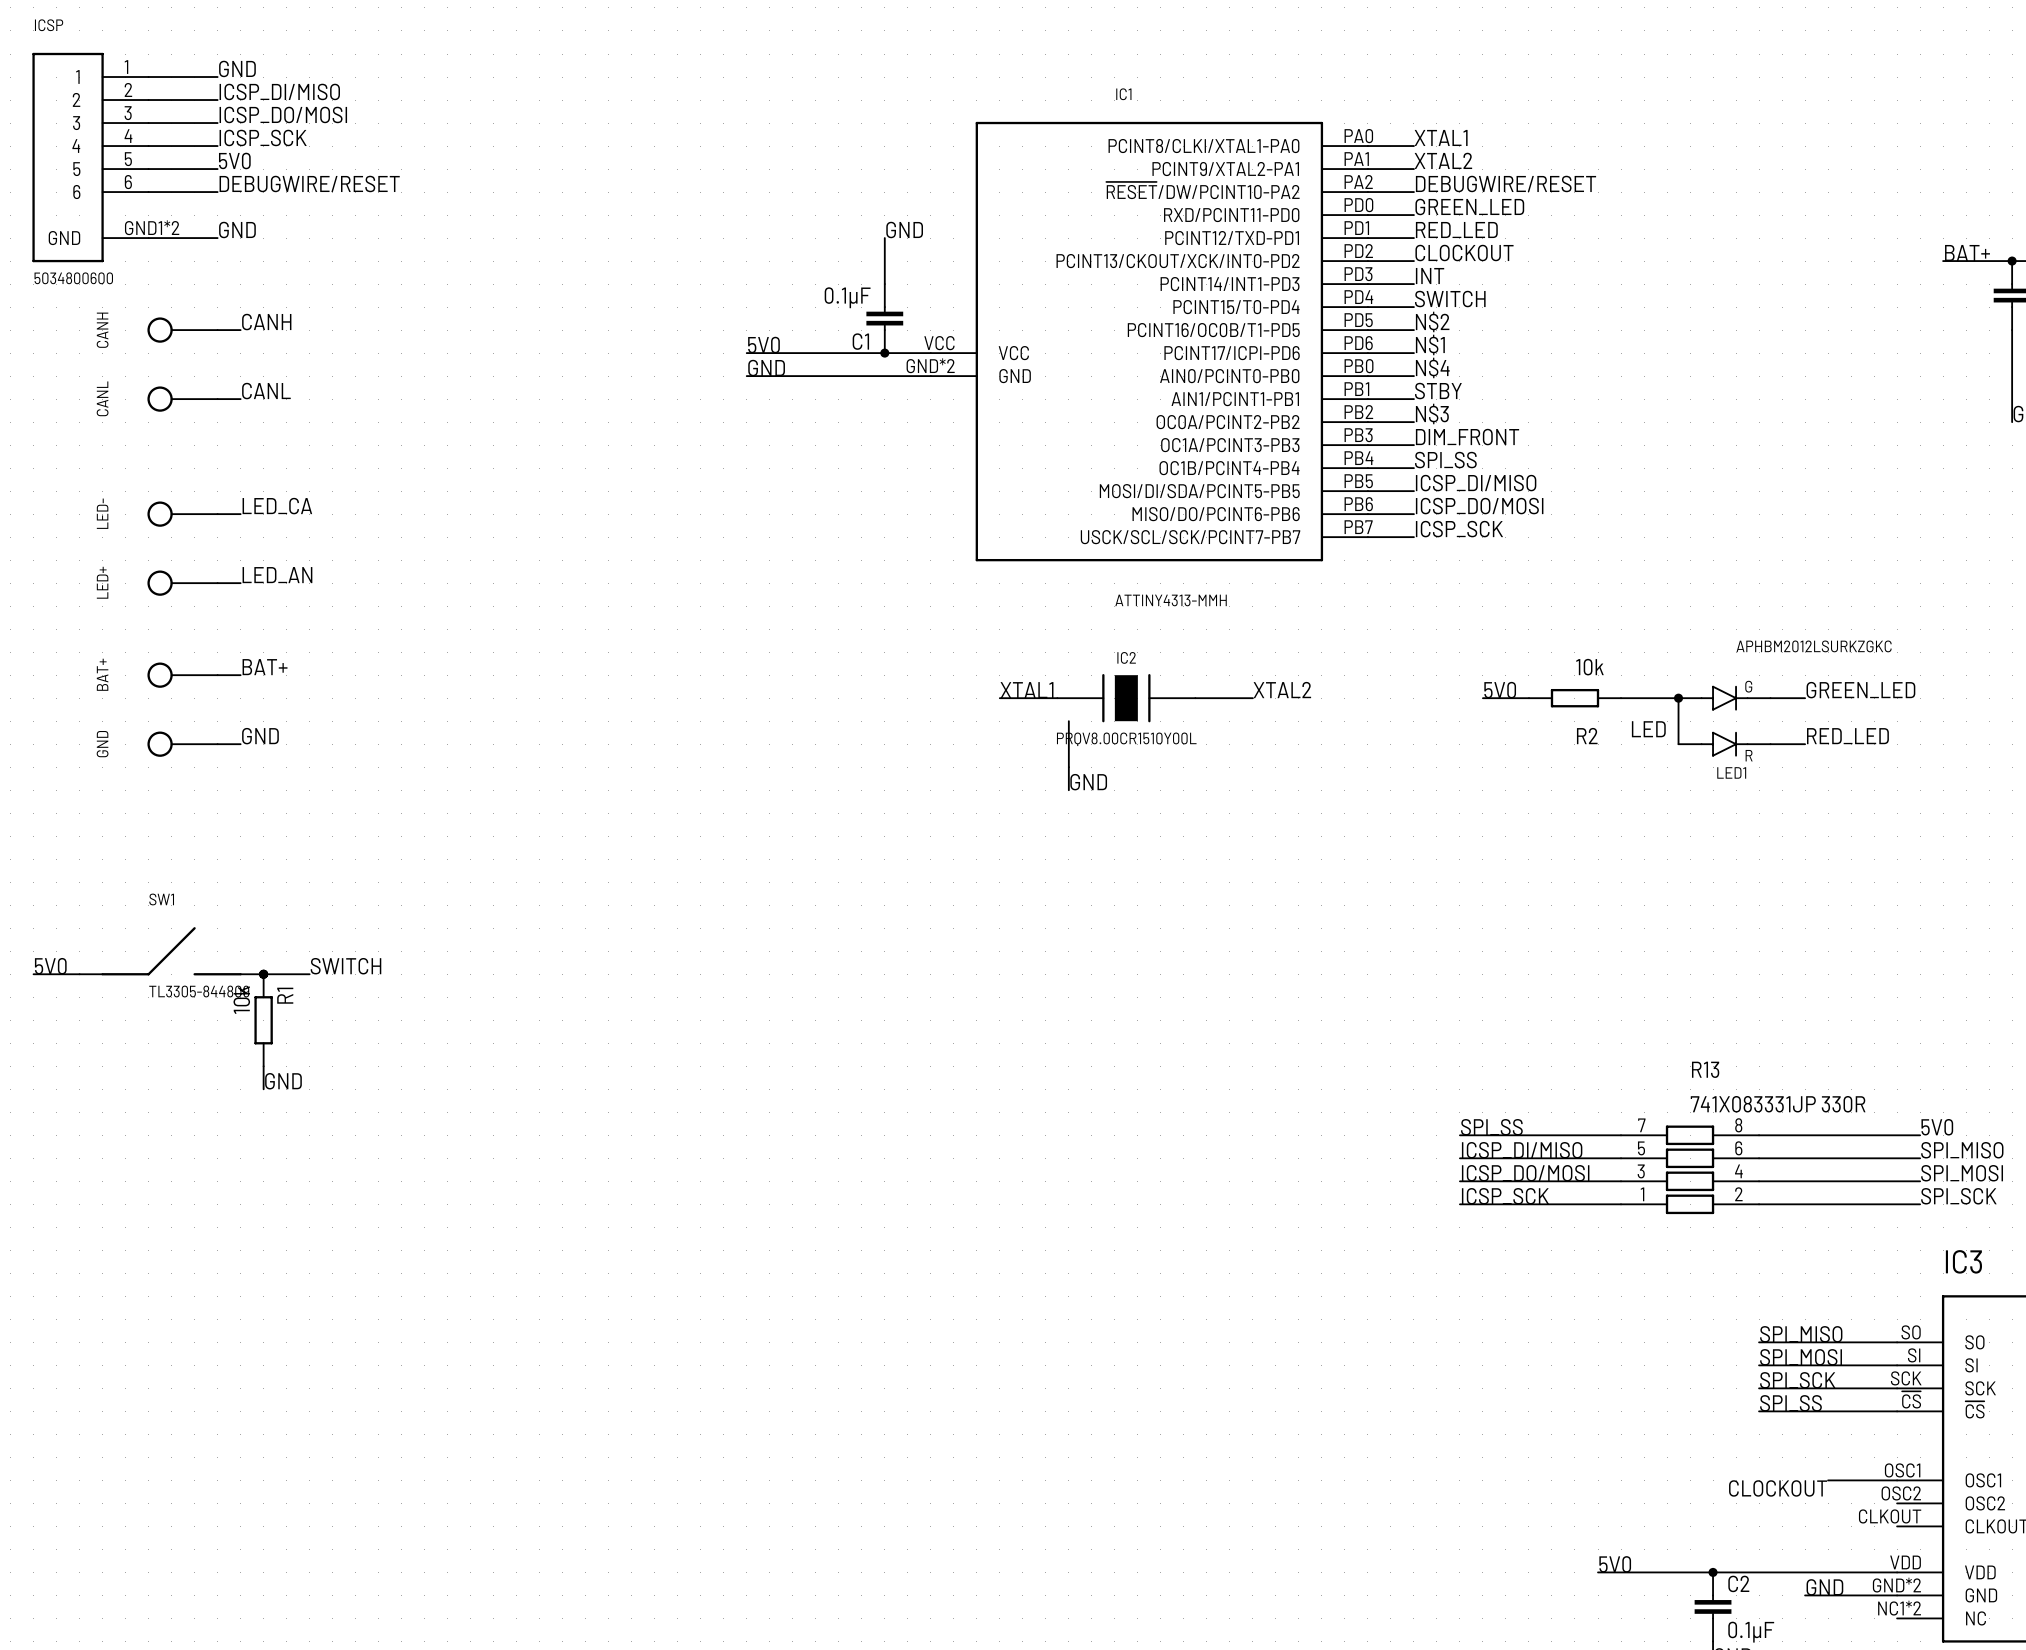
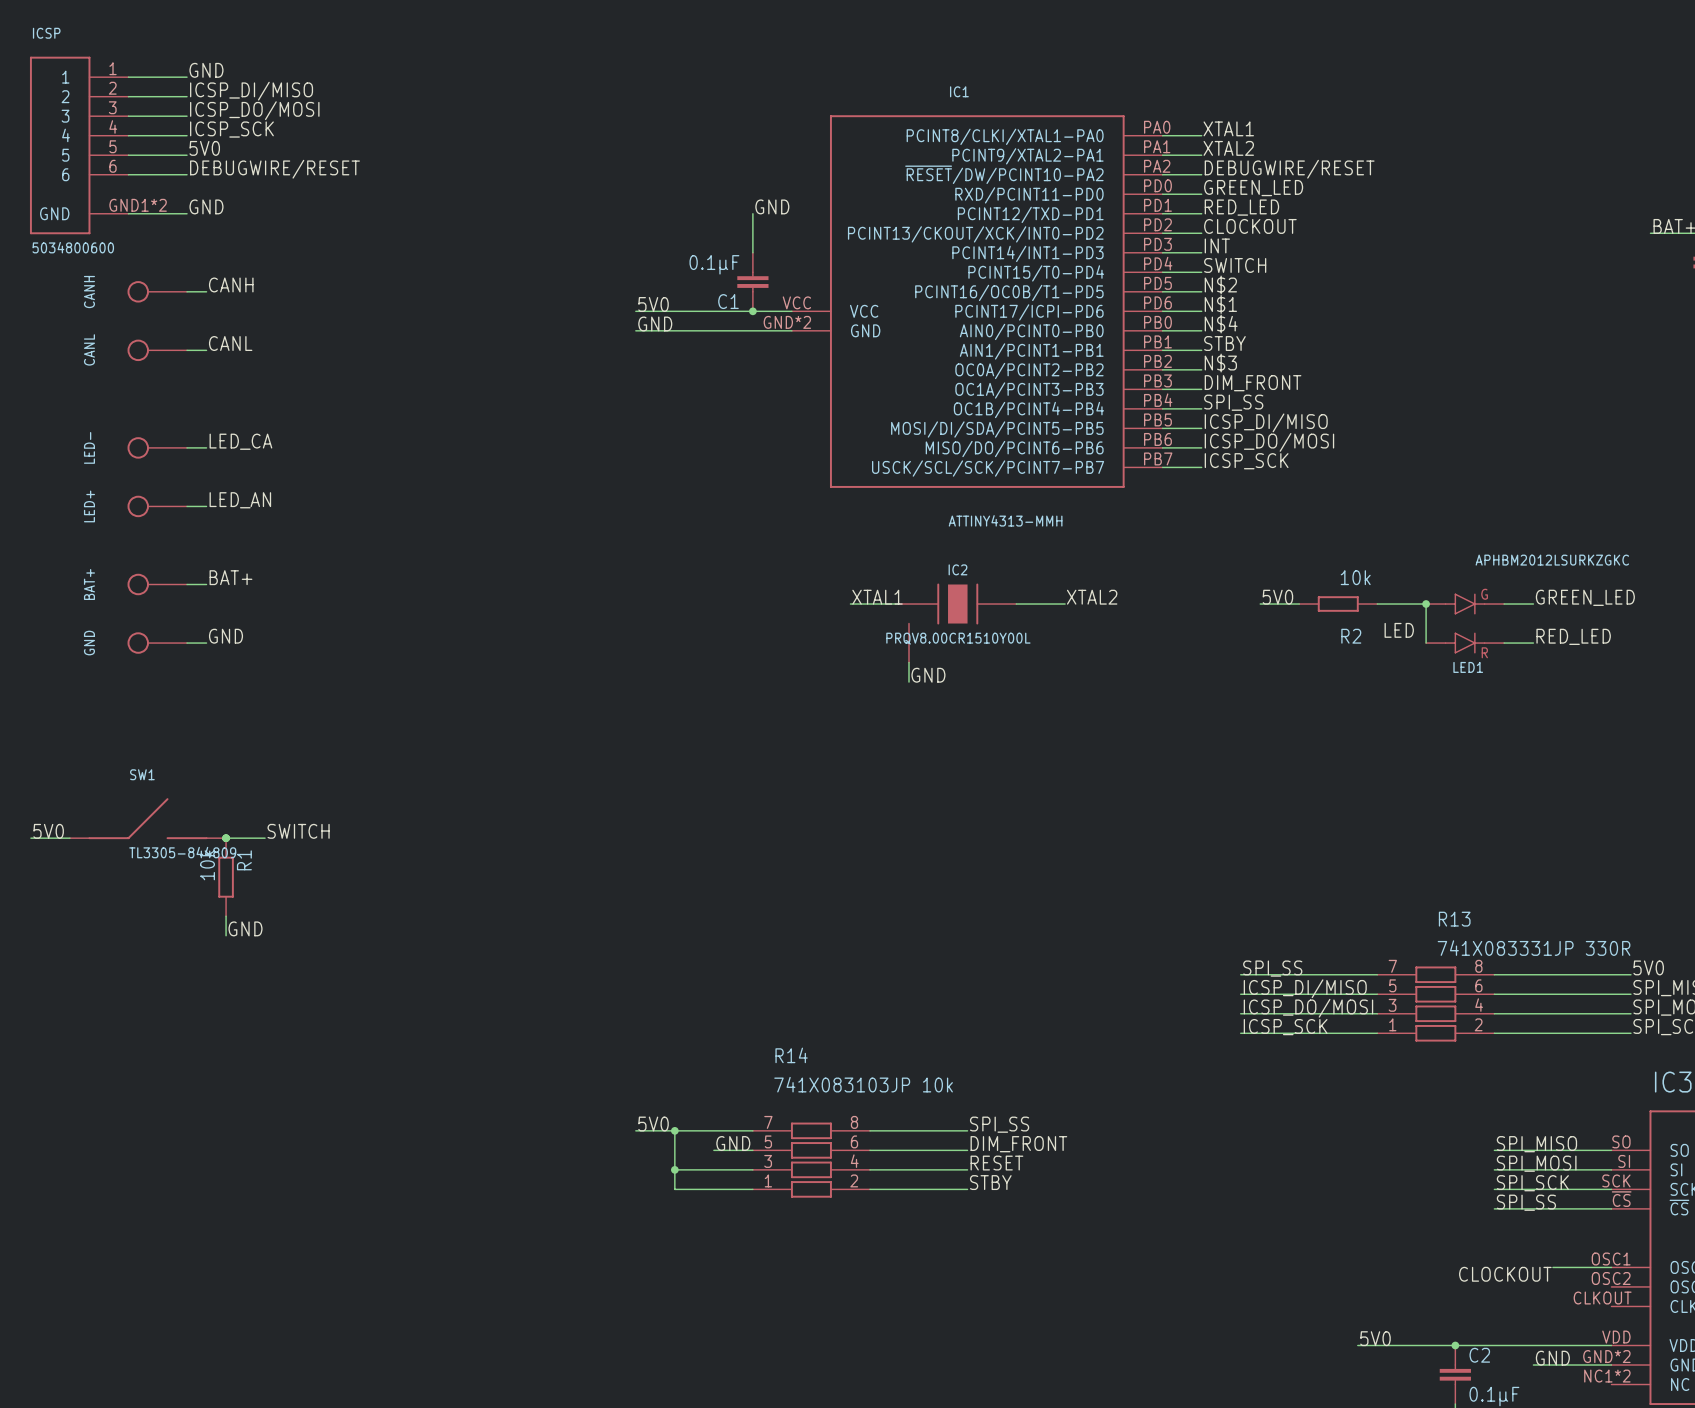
label: none -> 5V0 (653, 1124)
label: none -> SPI_SS (999, 1124)
wire: none -> (635, 1130) (752, 1130)
wire: none -> (674, 1130) (674, 1189) (752, 1189)
junction: none -> (674, 1130)
wire: none -> (869, 1130) (967, 1130)
label: none -> GND (733, 1143)
label: none -> DIM_FRONT (1018, 1144)
wire: none -> (713, 1150) (752, 1150)
wire: none -> (869, 1150) (967, 1150)
R14: none -> 741X083103JP 10k (811, 1160)
label: none -> RESET (996, 1163)
wire: none -> (674, 1169) (752, 1169)
junction: none -> (674, 1169)
wire: none -> (869, 1169) (967, 1169)
label: none -> STBY (990, 1182)
wire: none -> (869, 1189) (967, 1189)

